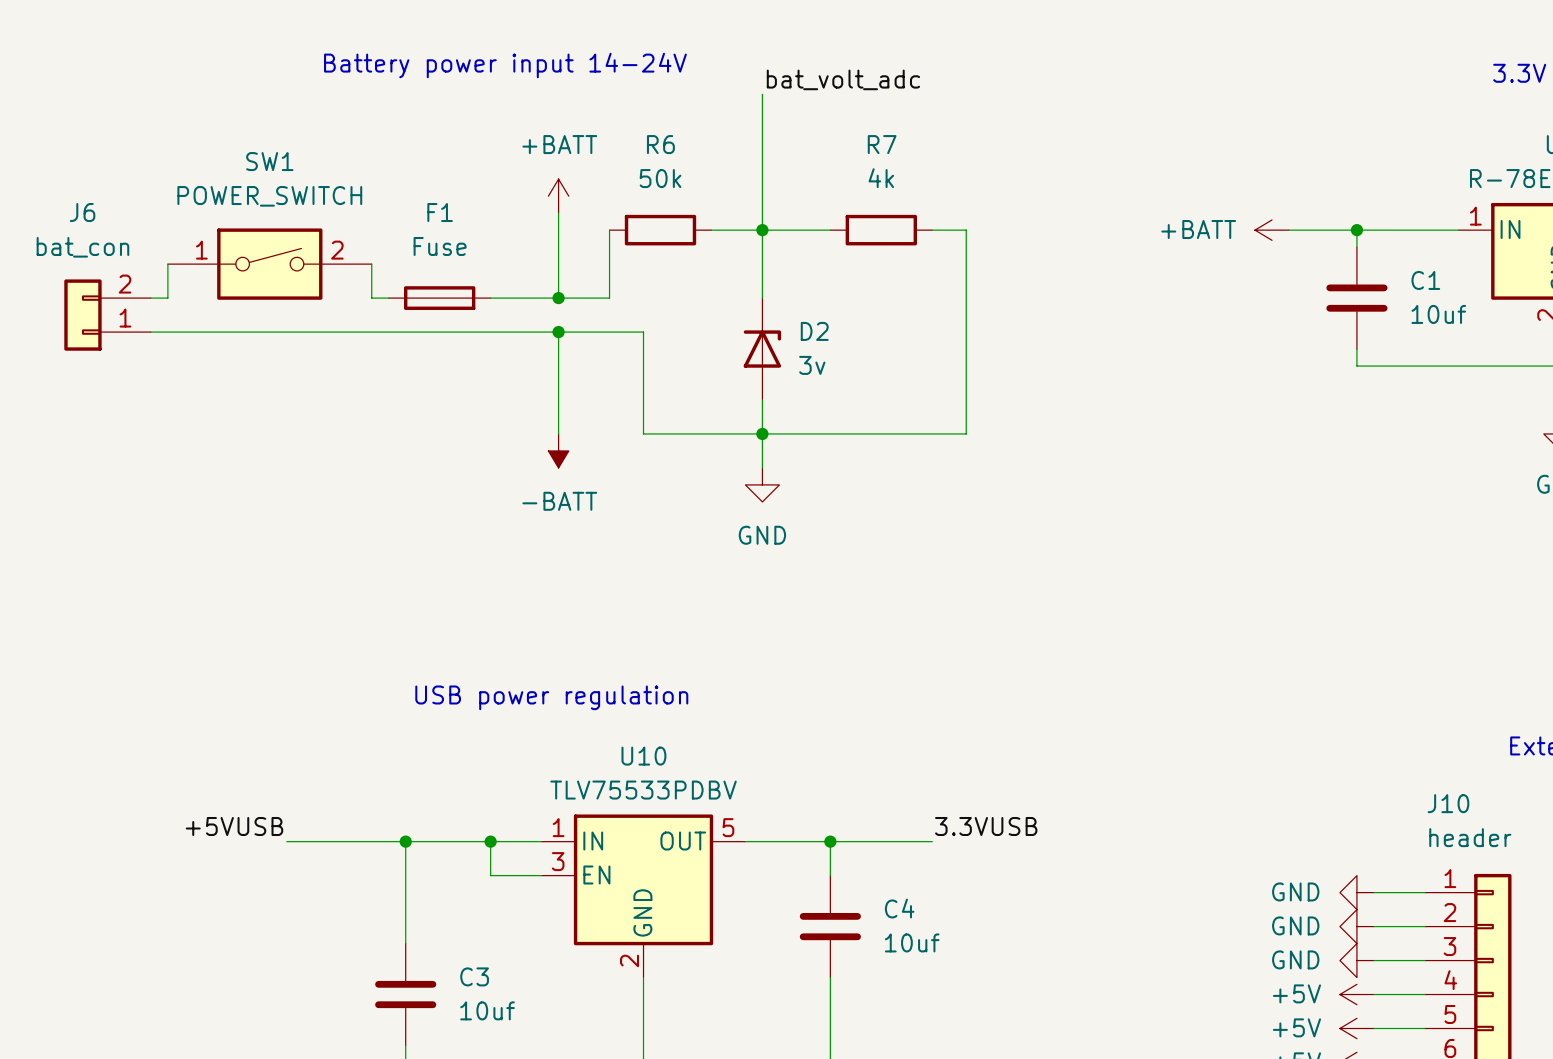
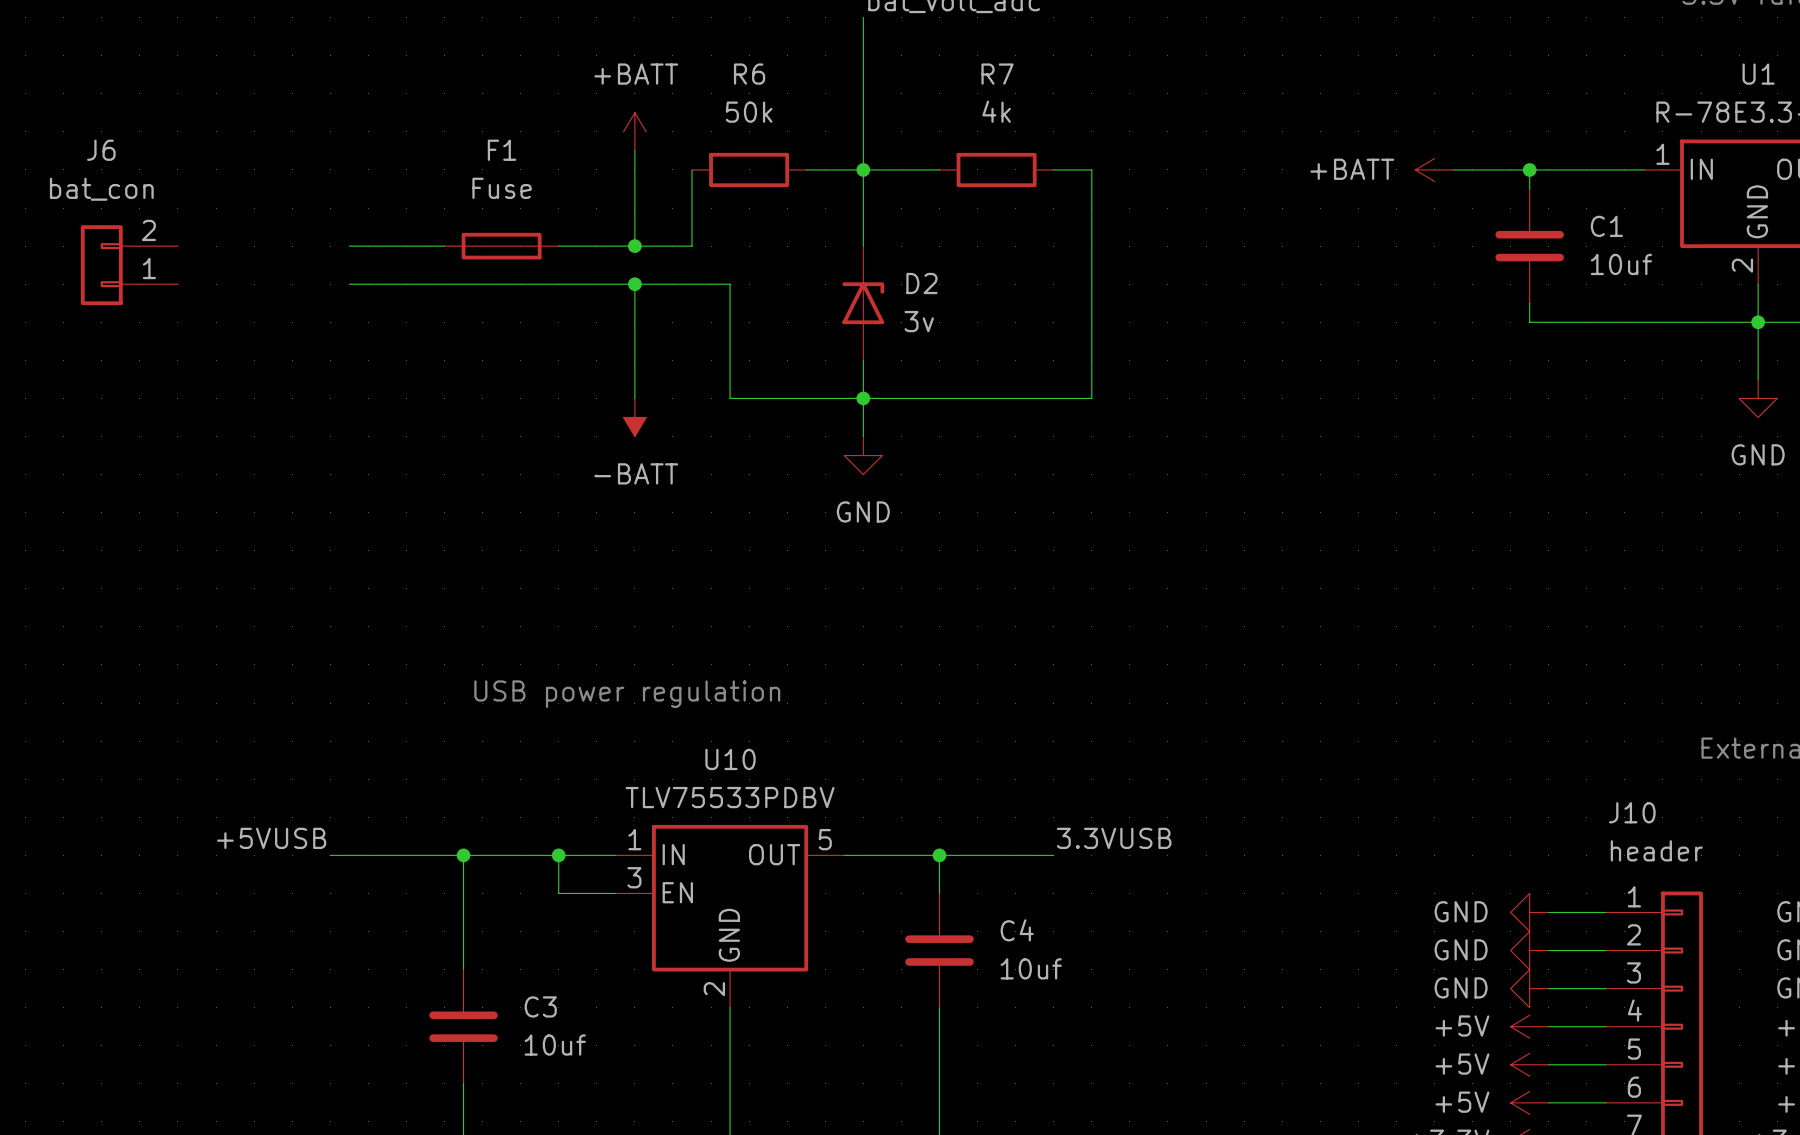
wire: (167, 264) (167, 298) (150, 298) -> none
SW1: POWER_SWITCH (269, 264) -> none
wire: (371, 264) (371, 298) -> (349, 246) (425, 246)
wire: (150, 332) (303, 332) -> none

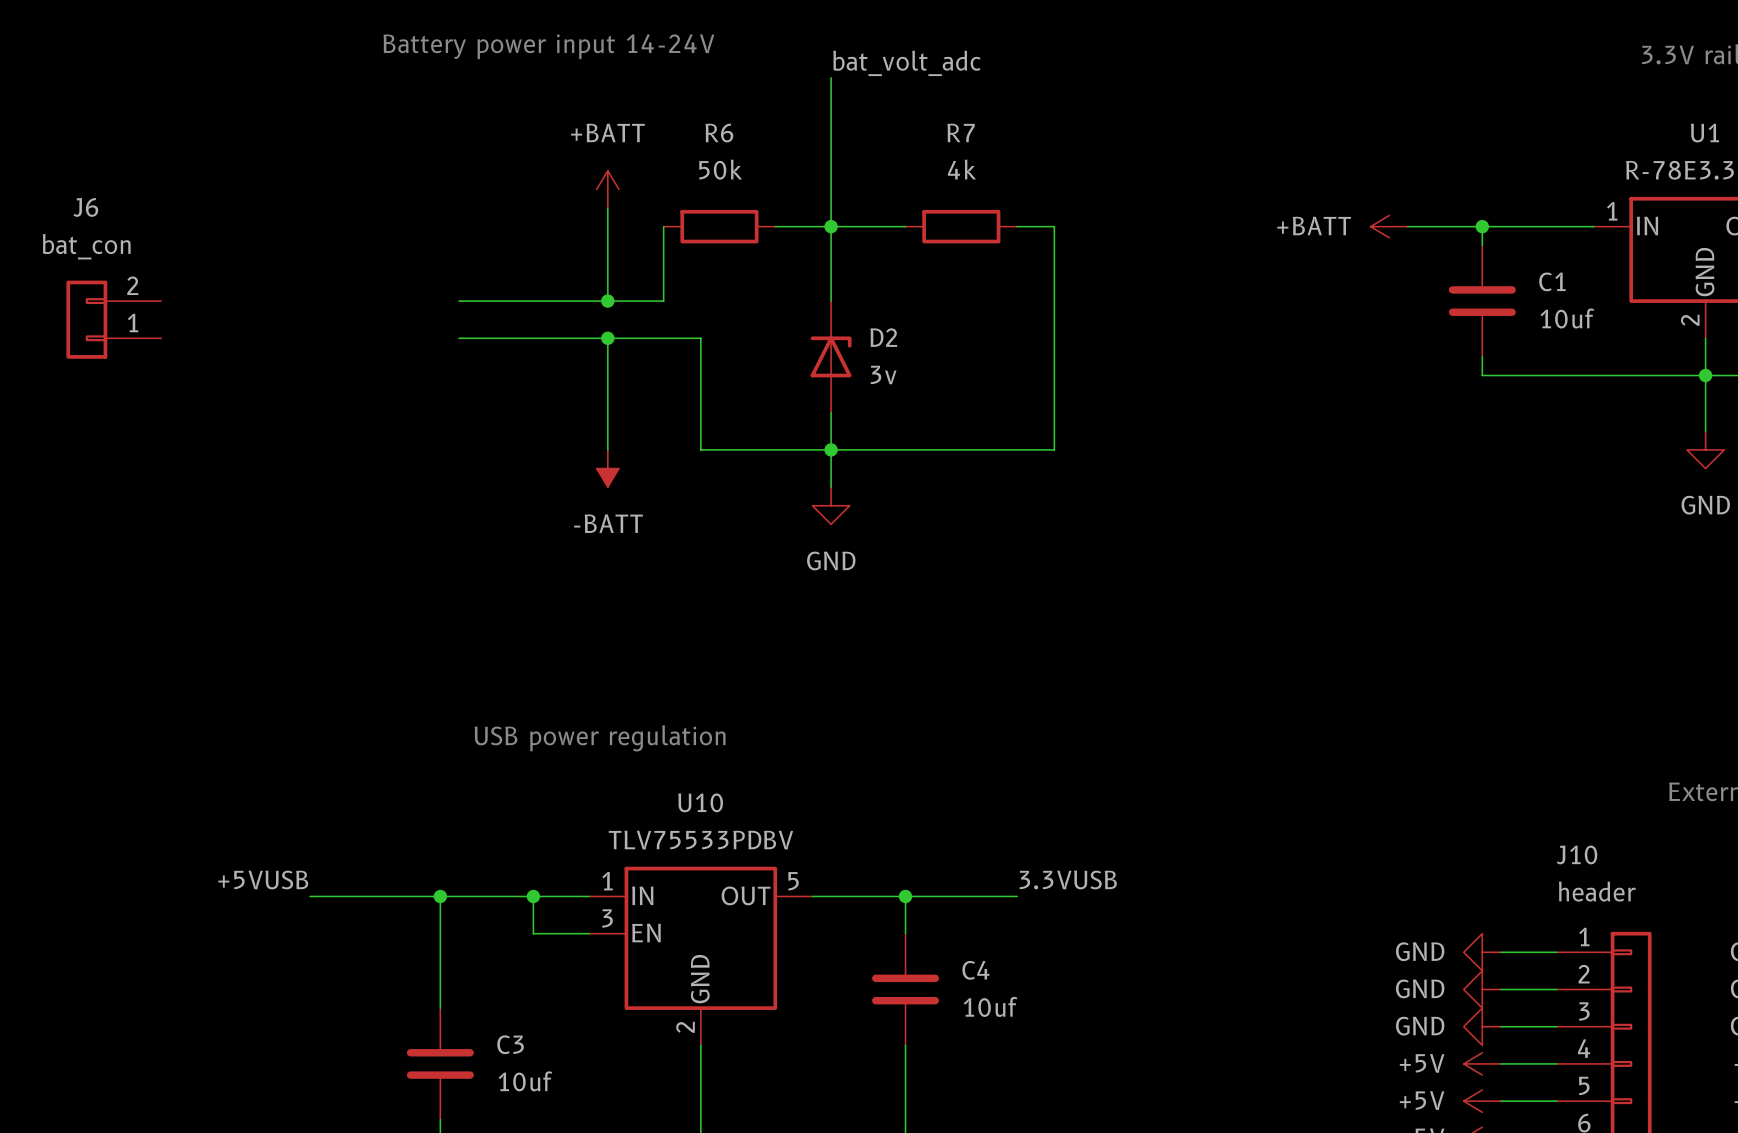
wire: (349, 246) (444, 246) -> none
F1: Fuse (501, 246) -> none
wire: (349, 284) (482, 284) -> none

